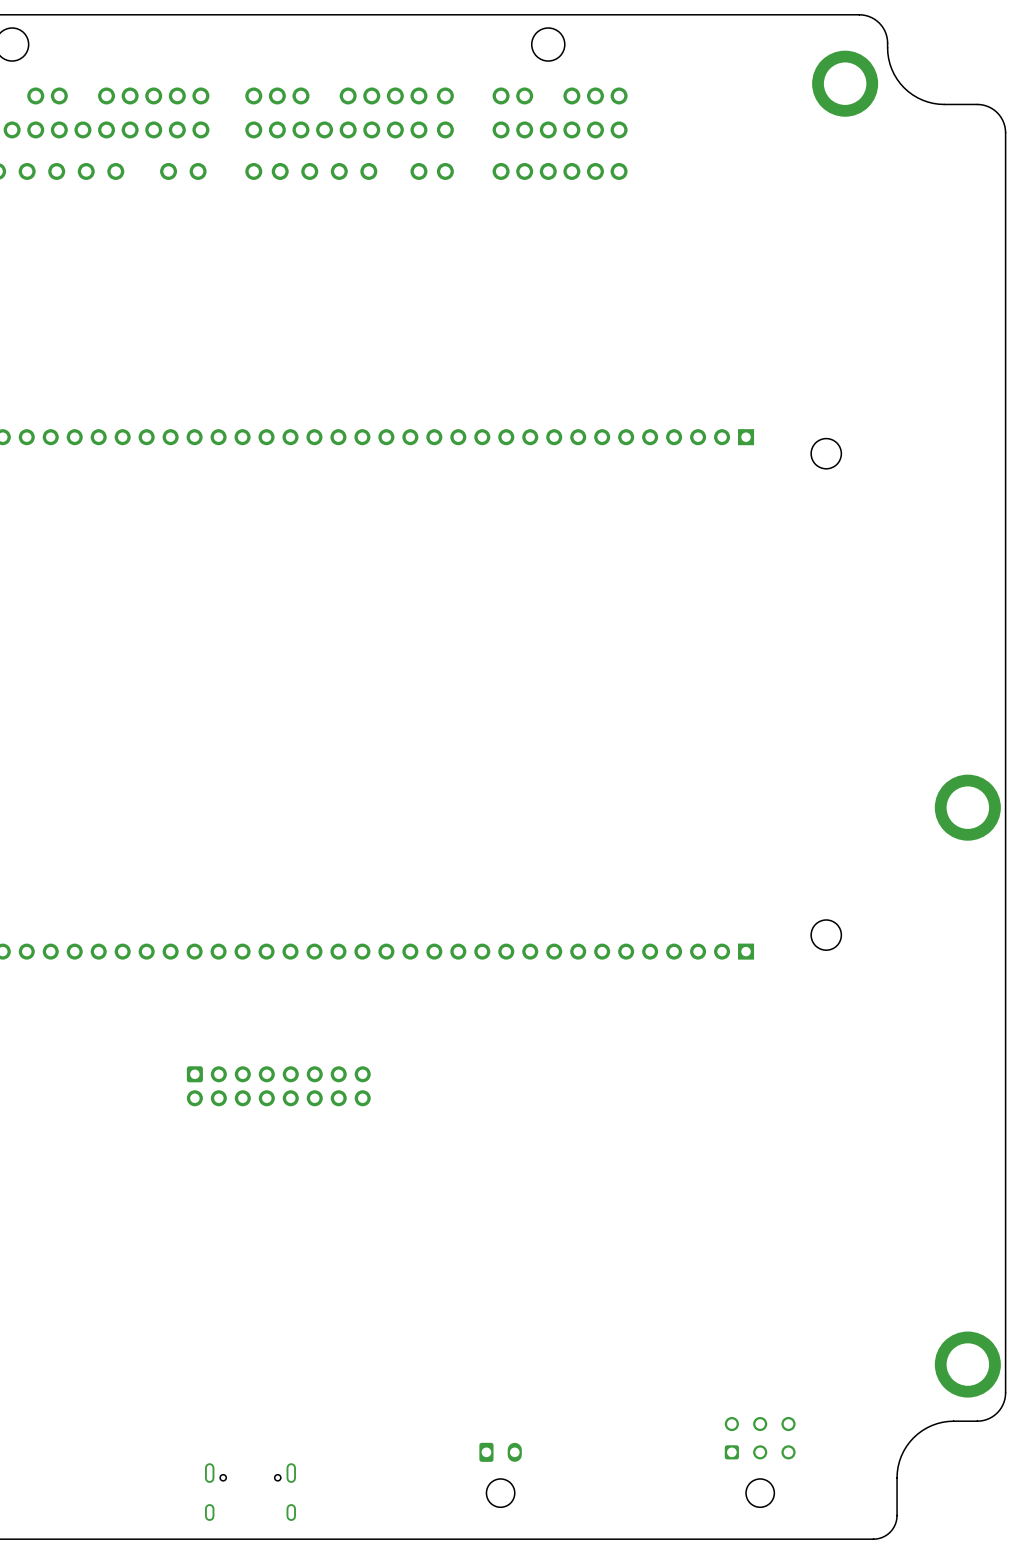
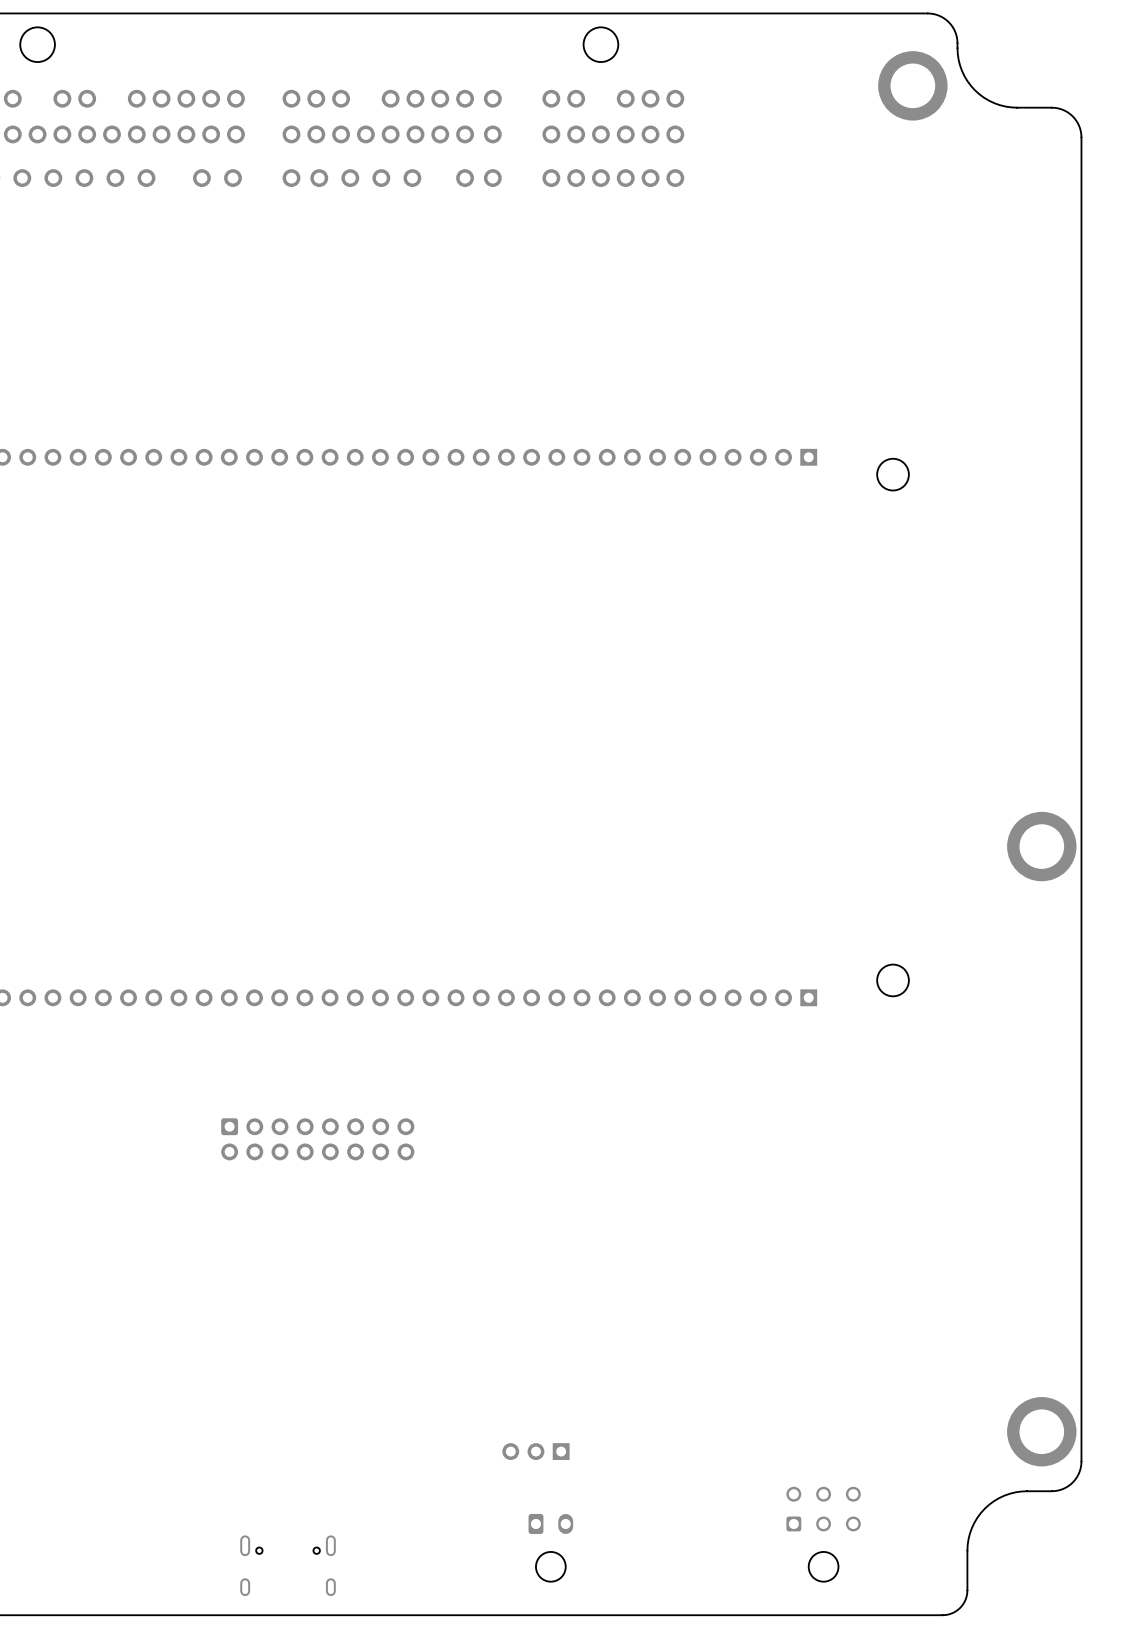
part: none -> (535, 1451)

